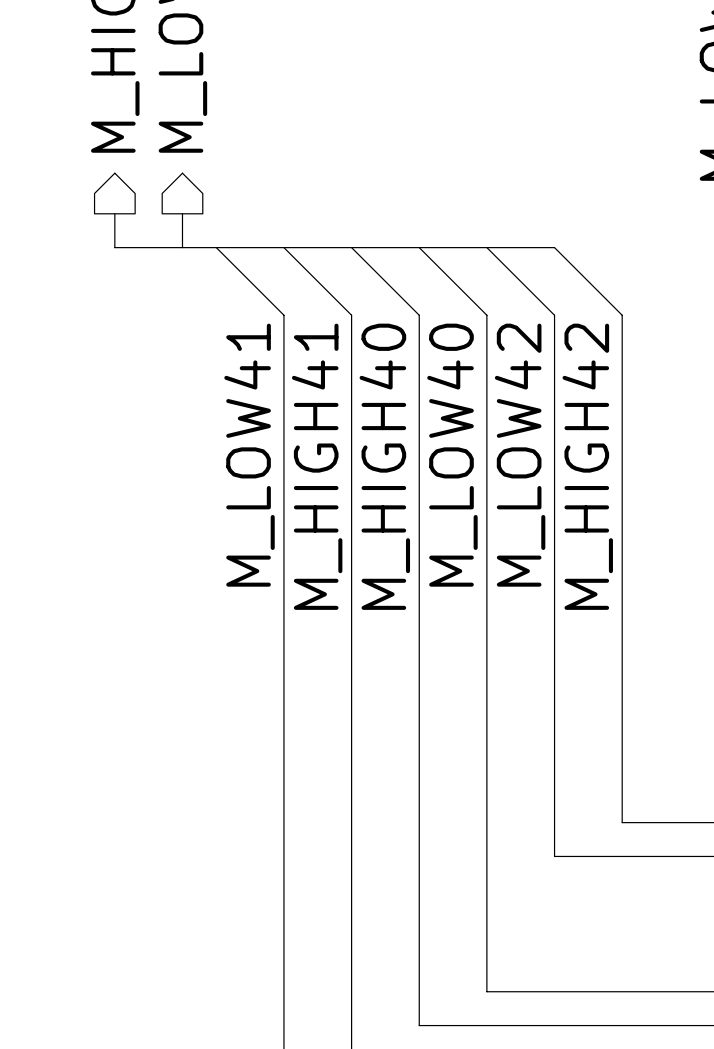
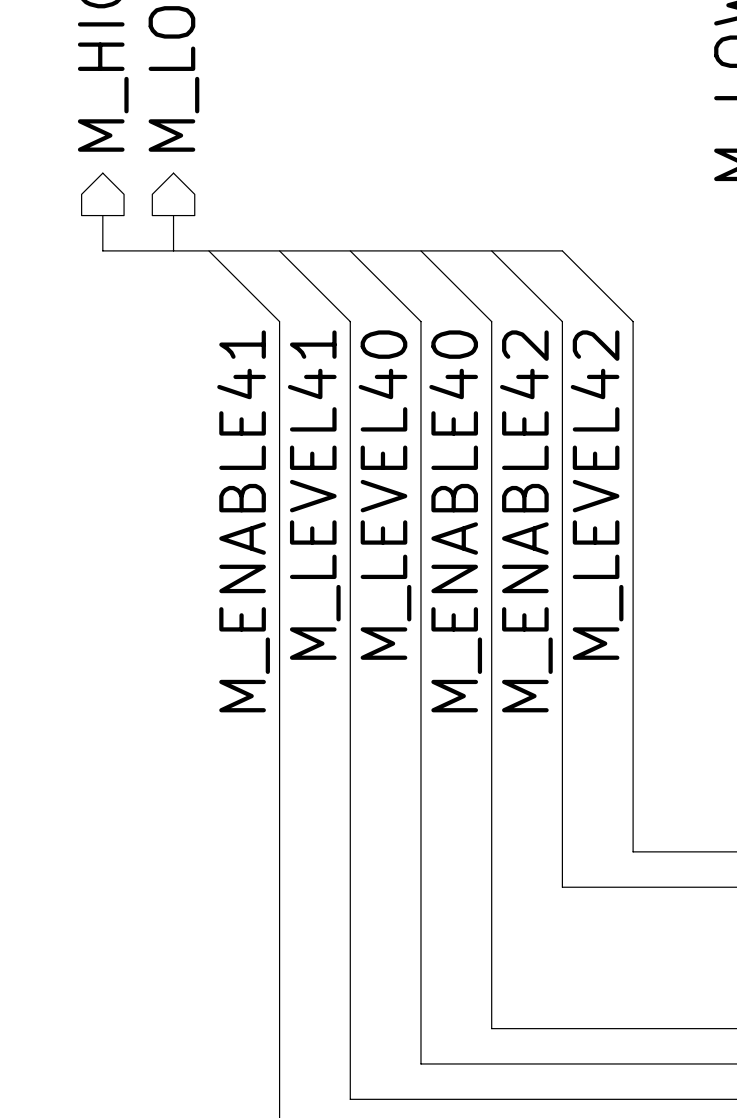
label: M_LOW41 (249, 455) -> M_ENABLE41 (243, 521)
label: M_LOW40 (452, 455) -> M_ENABLE40 (455, 521)
label: M_LOW42 (520, 455) -> M_ENABLE42 (526, 521)
label: M_HIGH41 (317, 466) -> M_LEVEL41 (314, 495)
label: M_HIGH40 (384, 466) -> M_LEVEL40 (384, 495)
label: M_HIGH42 (587, 466) -> M_LEVEL42 (597, 495)

